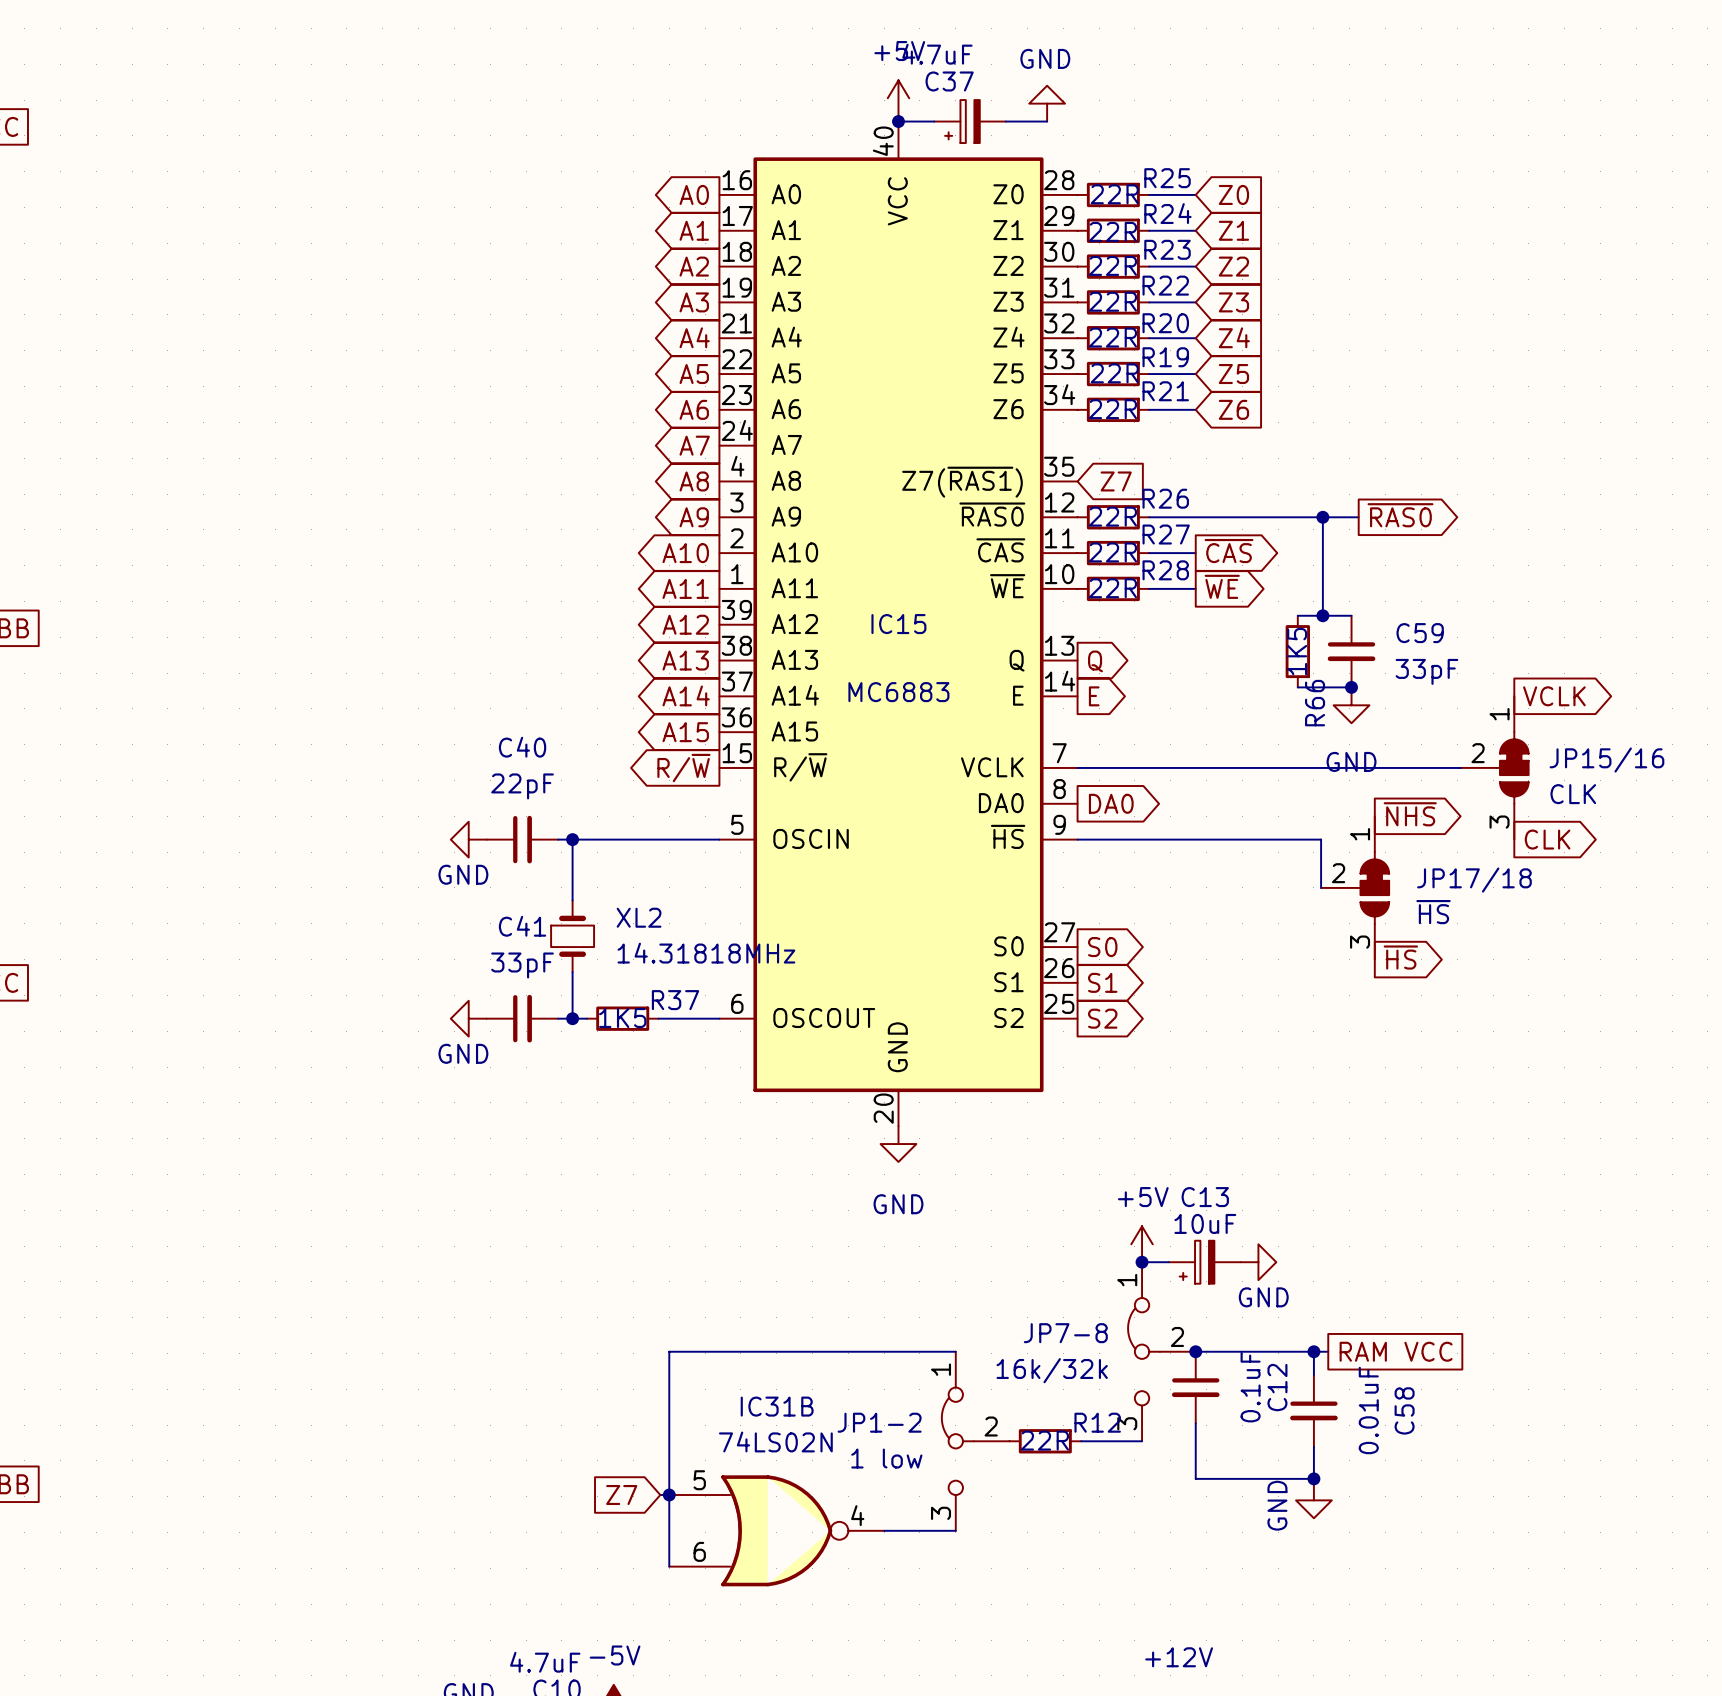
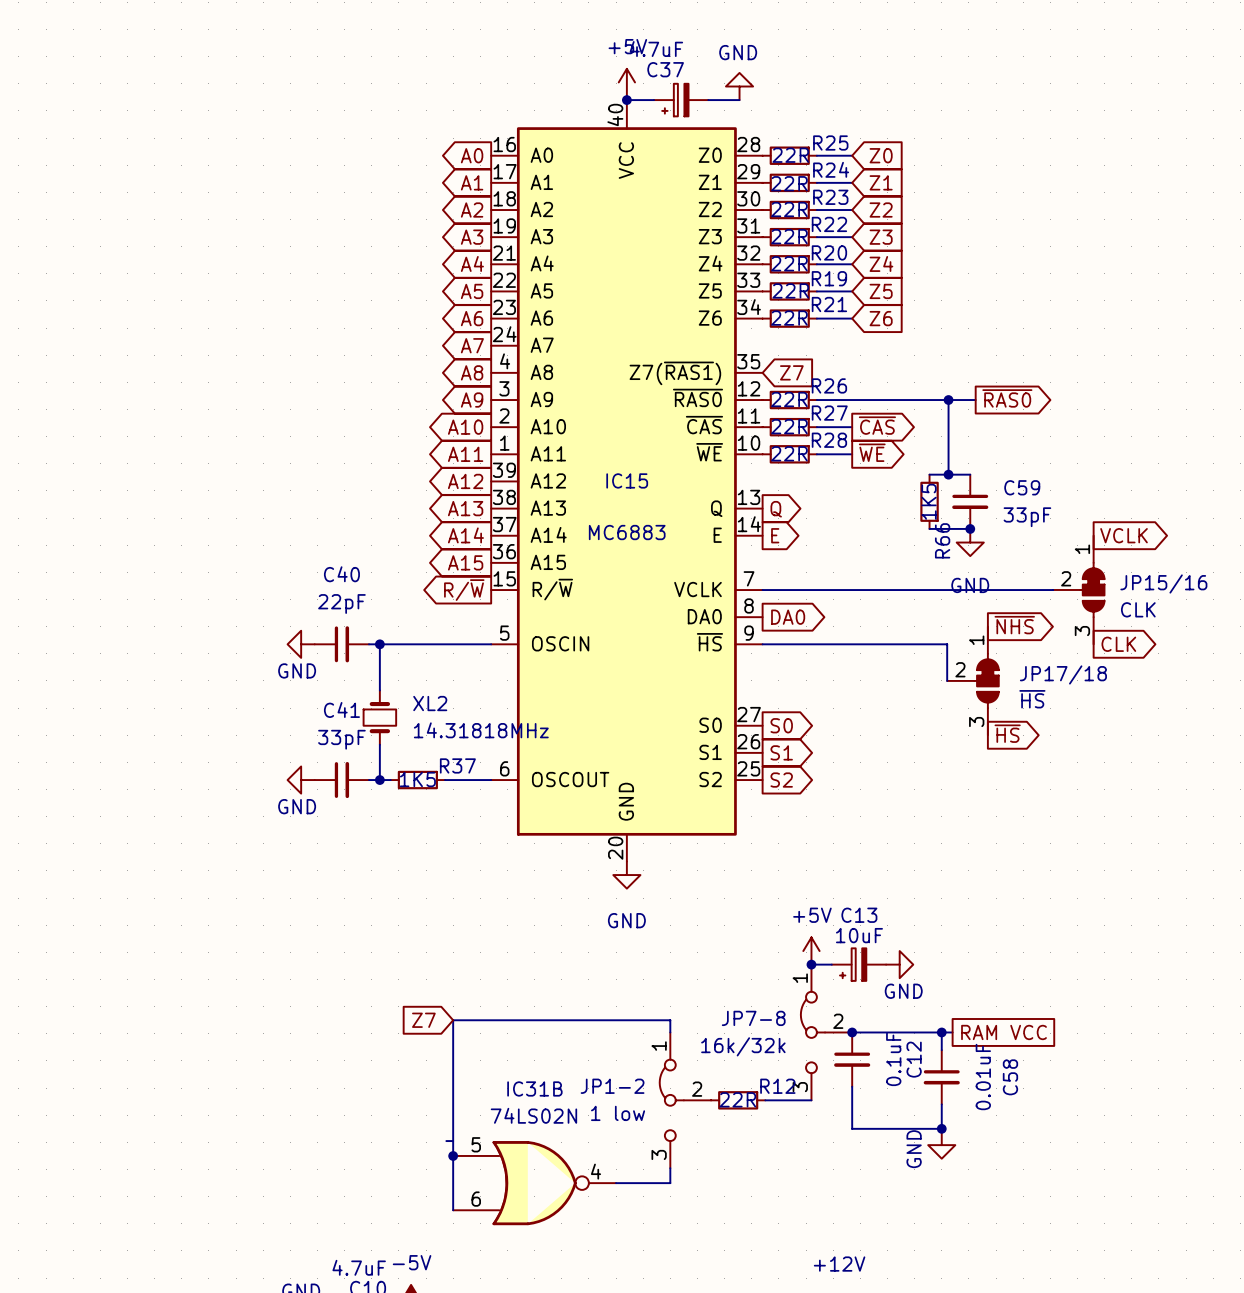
wire: (669, 1351) (955, 1351) -> (453, 1032) (453, 1020) (670, 1020) (670, 1032)
global label position: Z7 (621, 1495) -> Z7 (423, 1020)
junction position: (669, 1495) -> (453, 1155)
IC31B position: (776, 1530) -> (534, 1183)
wire: (884, 1530) (955, 1530) -> (616, 1183) (670, 1183) (670, 1168)
wire: none -> (453, 1195) (453, 1210)

